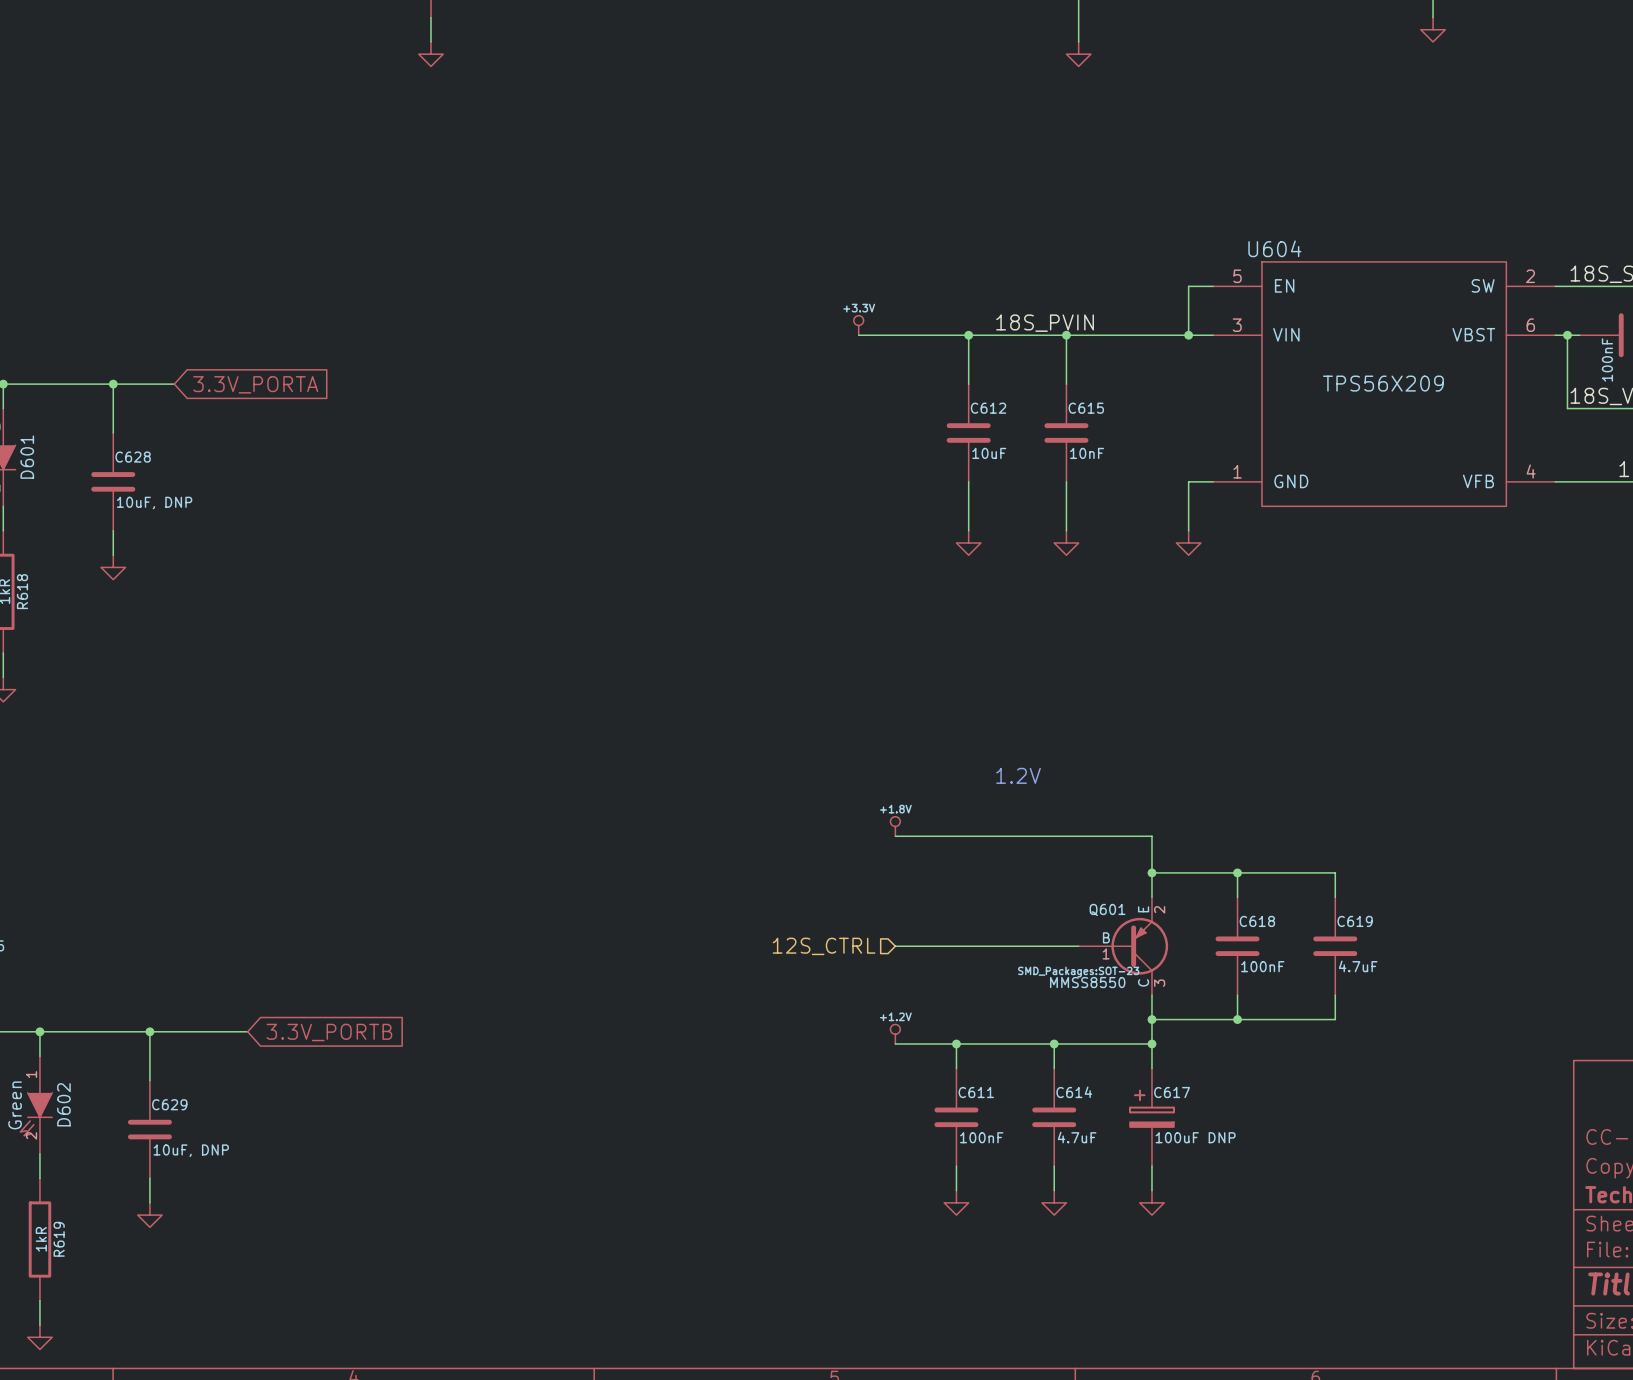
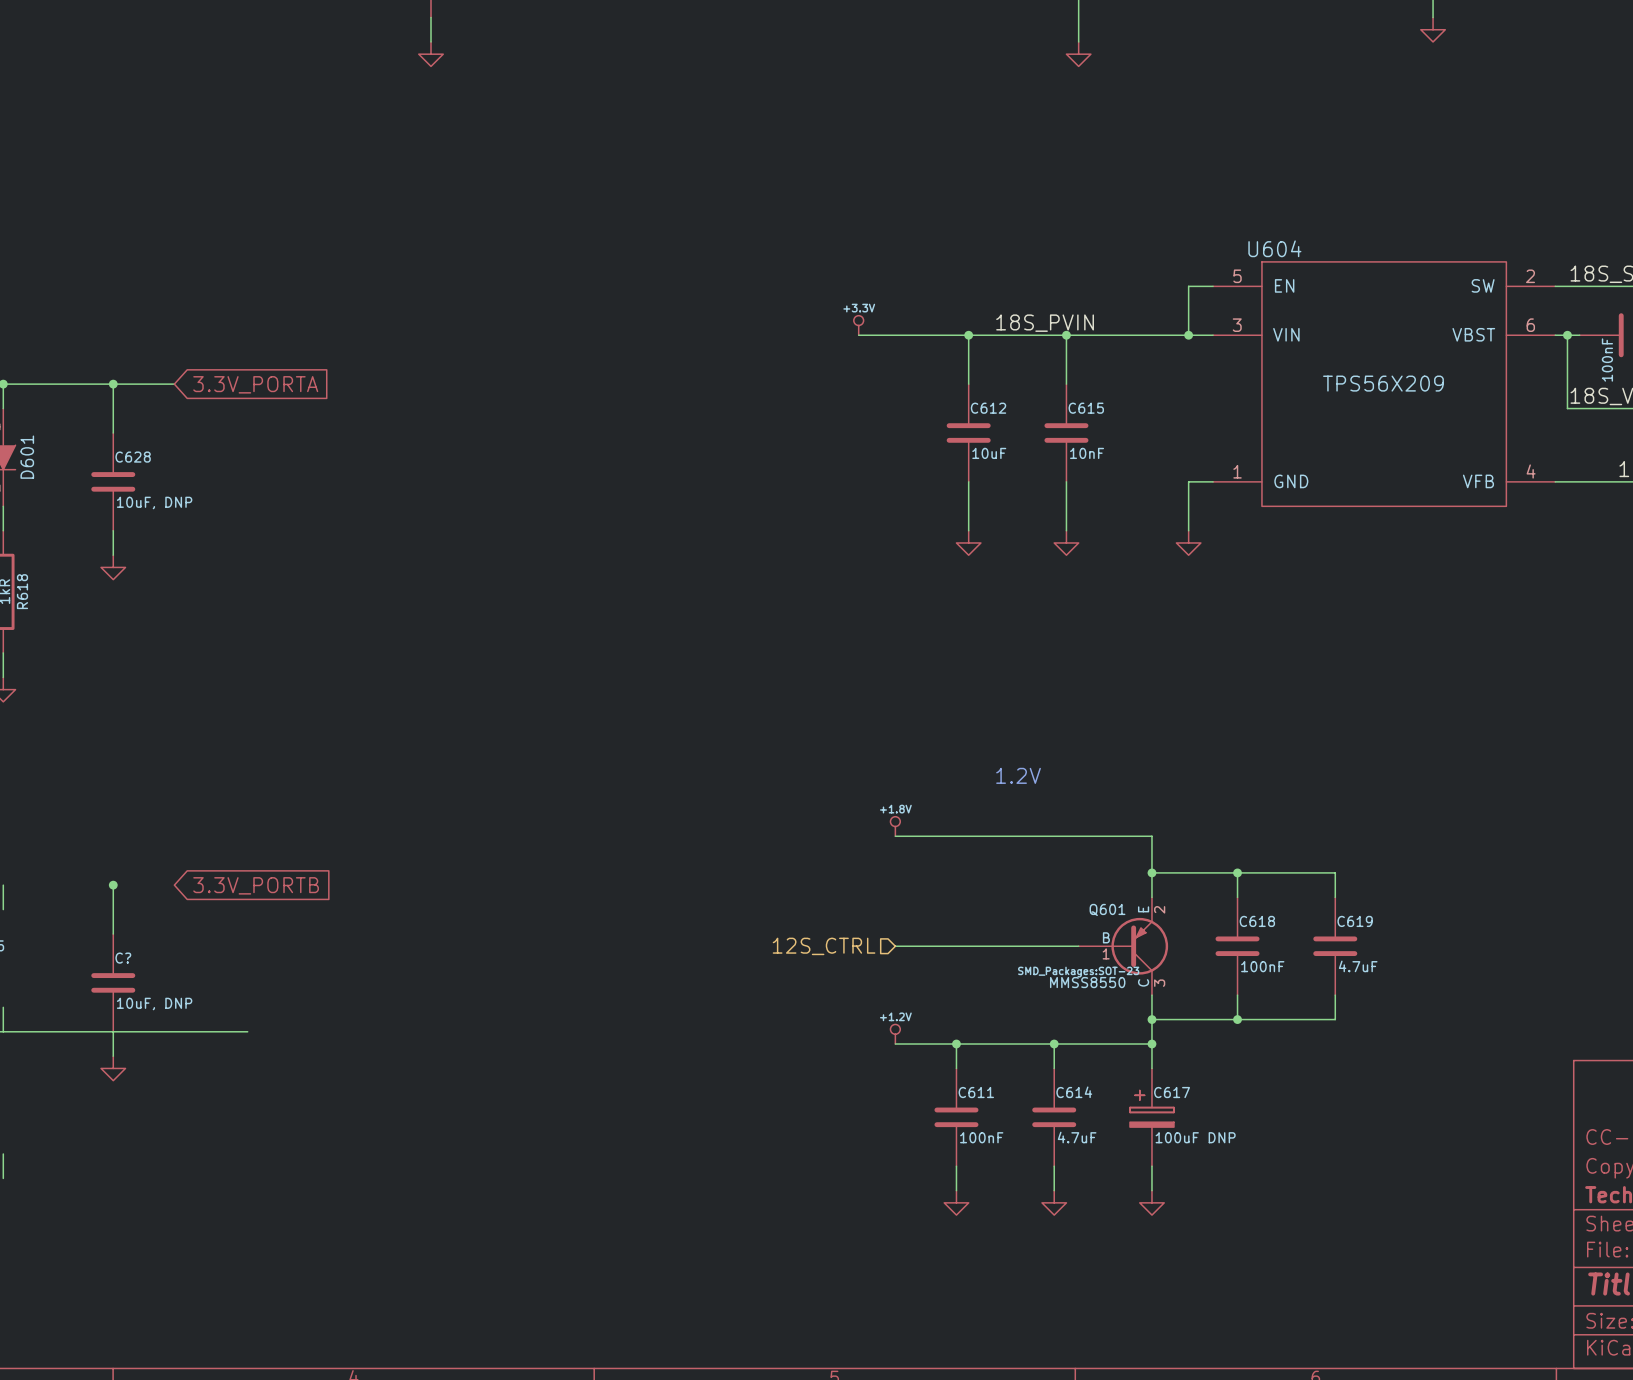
junction: none -> (113, 885)
C?: none -> 10uF, DNP (113, 982)
wire: (39, 1031) (39, 1056) -> (3, 885) (3, 909)
junction: (39, 1031) -> none
wire: (149, 1031) (149, 1080) -> (113, 885) (113, 934)
junction: (149, 1031) -> none
global label position: 3.3V_PORTB (329, 1032) -> 3.3V_PORTB (256, 885)
power symbol: none -> (113, 1068)
D602: Green (36, 1105) -> none
C629: 10uF, DNP (149, 1129) -> none
wire: (39, 1153) (39, 1178) -> (3, 1007) (3, 1031)
wire: (149, 1178) (149, 1202) -> (113, 1031) (113, 1056)
power symbol: (149, 1215) -> none
R619: 1kR (39, 1239) -> none
wire: (39, 1300) (39, 1325) -> (3, 1153) (3, 1178)
power symbol: (39, 1337) -> none

